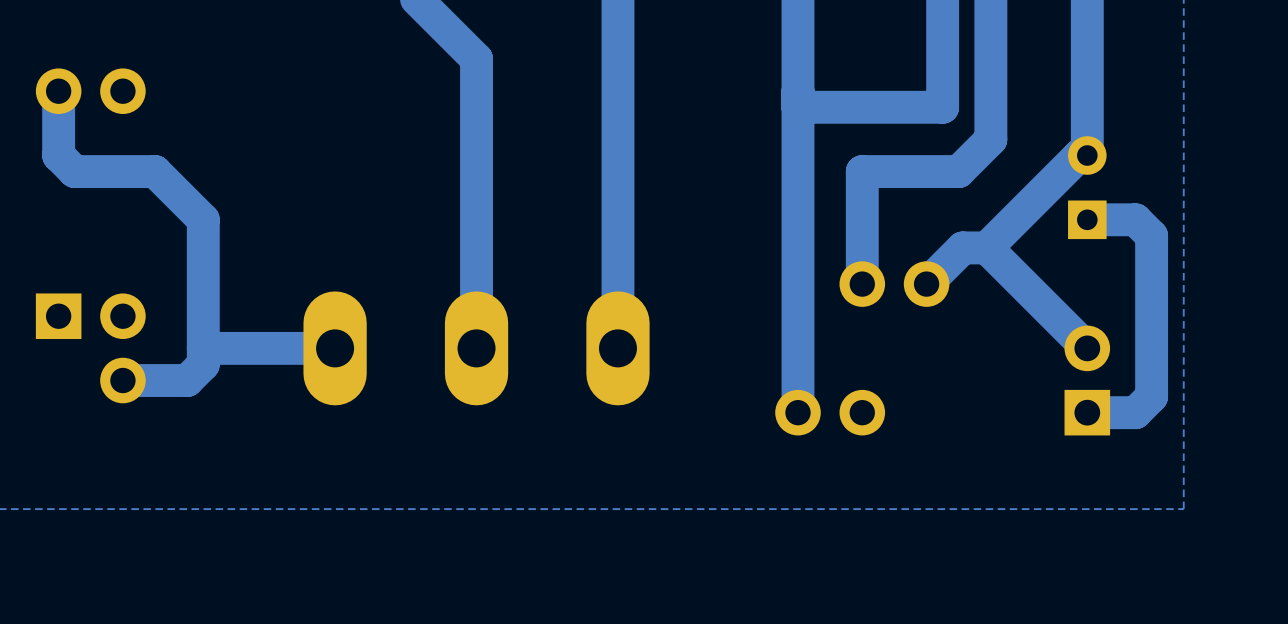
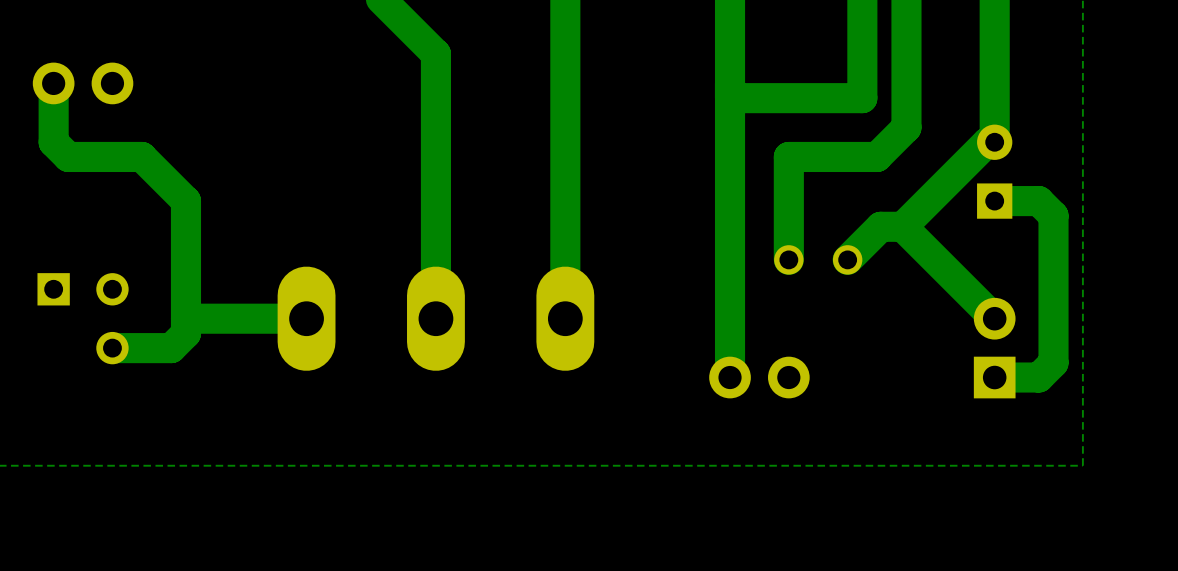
part footprint: [839, 261, 950, 307] -> [774, 245, 863, 275]
part footprint: [35, 293, 146, 404] -> [37, 273, 129, 365]

